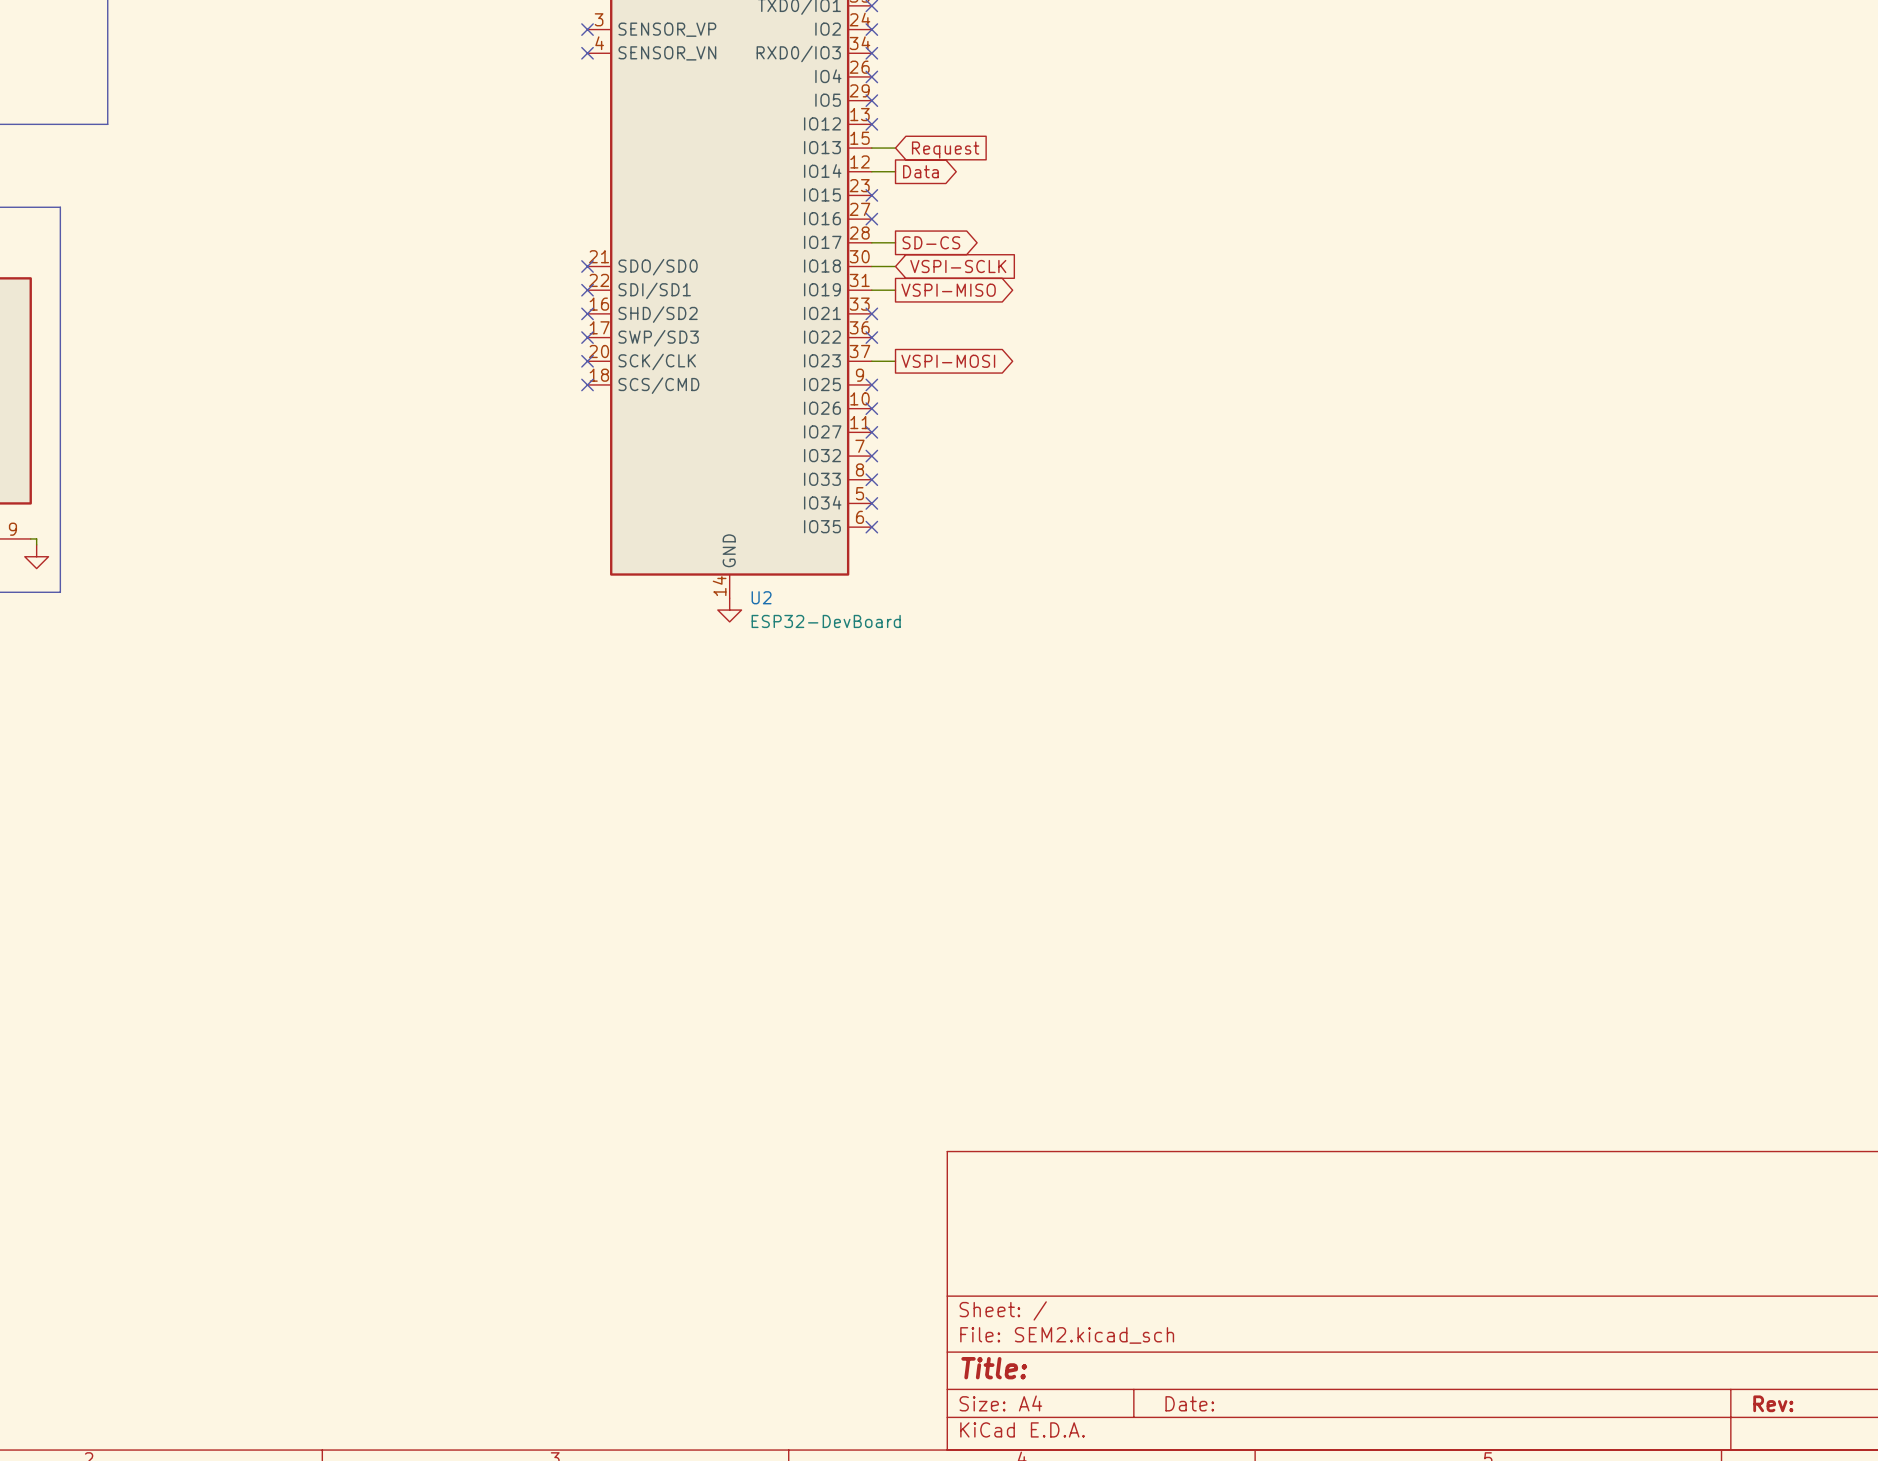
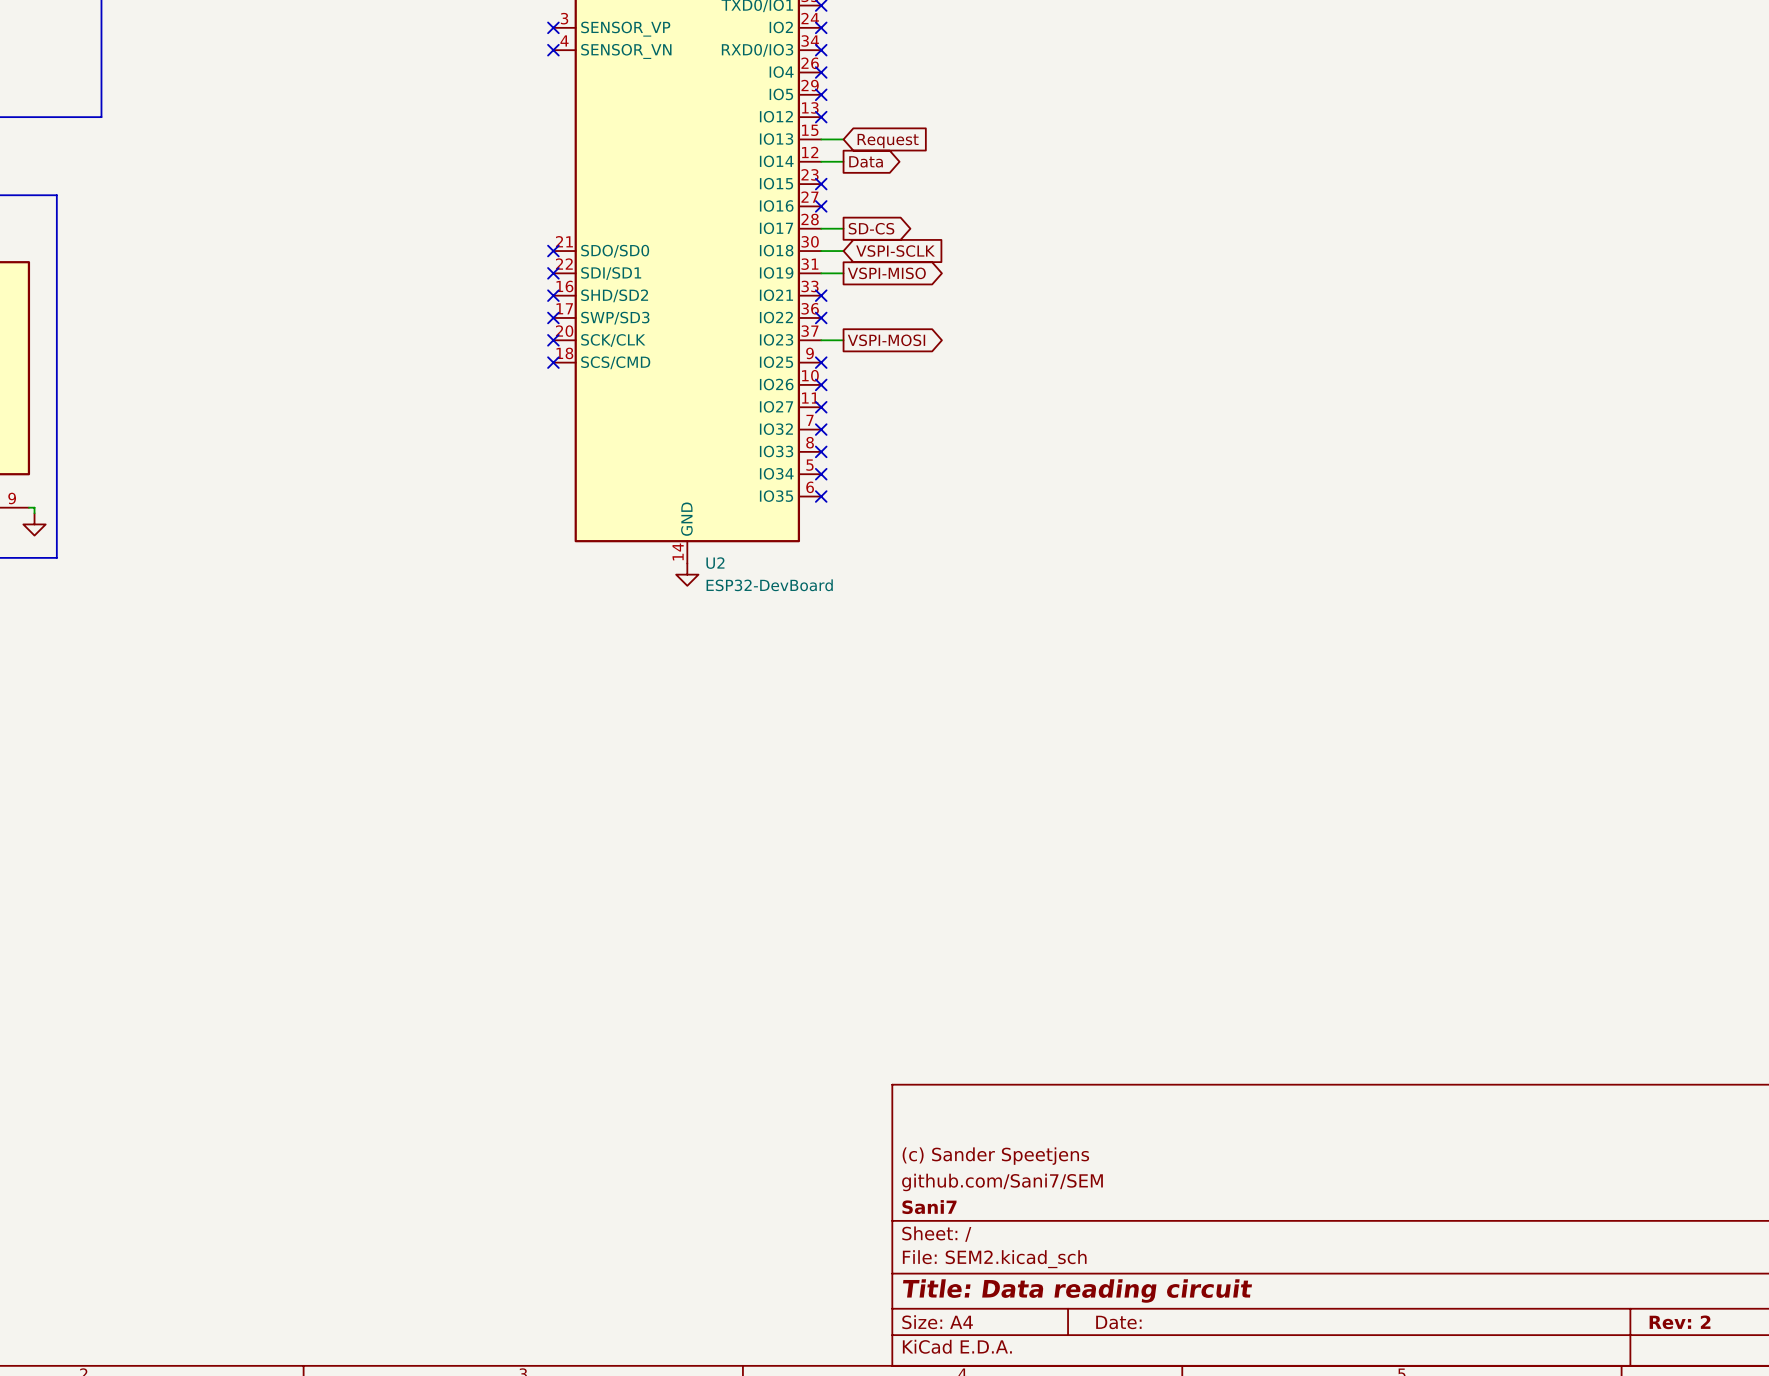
title block: none -> (c) Sander Speetjens (995, 1156)
title block: none -> github.com/Sani7/SEM (1002, 1182)
title block: none -> Sani7 (929, 1207)
title block: Title: (994, 1368) -> Title: Data reading circuit (1077, 1291)
title block: Rev: (1773, 1403) -> Rev: 2 (1680, 1322)

